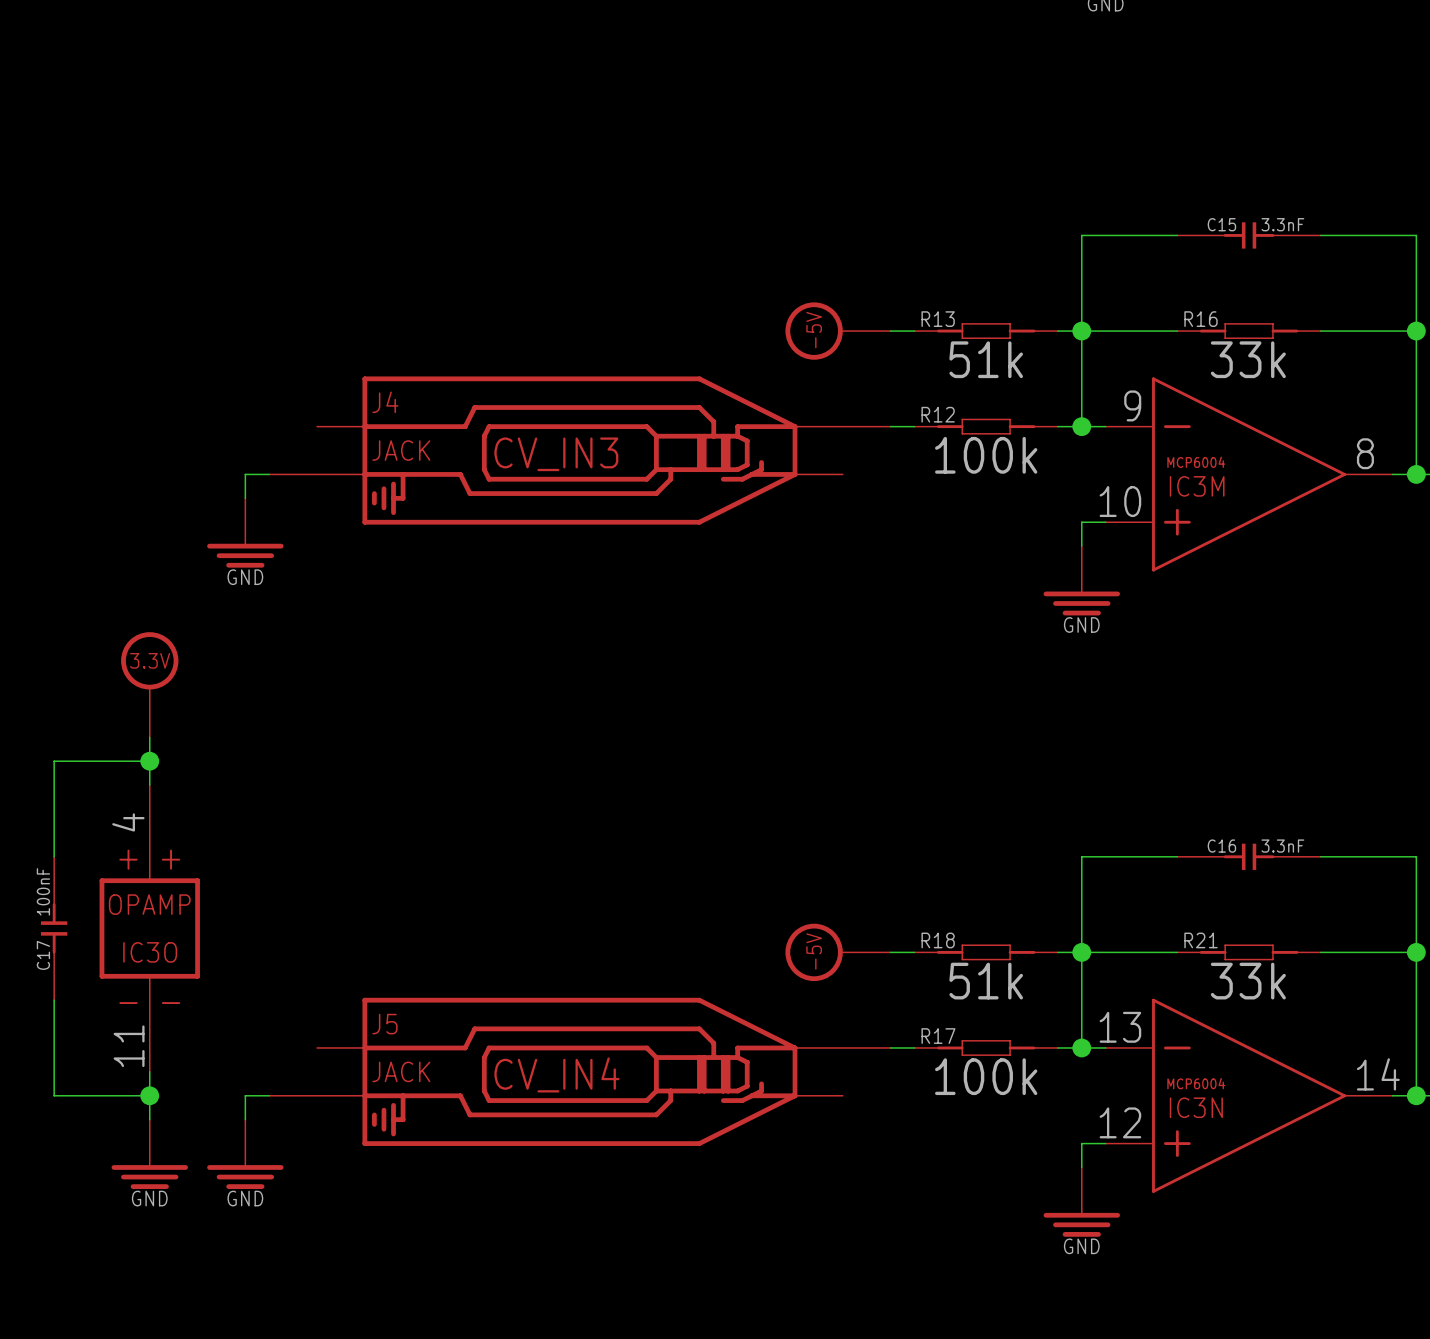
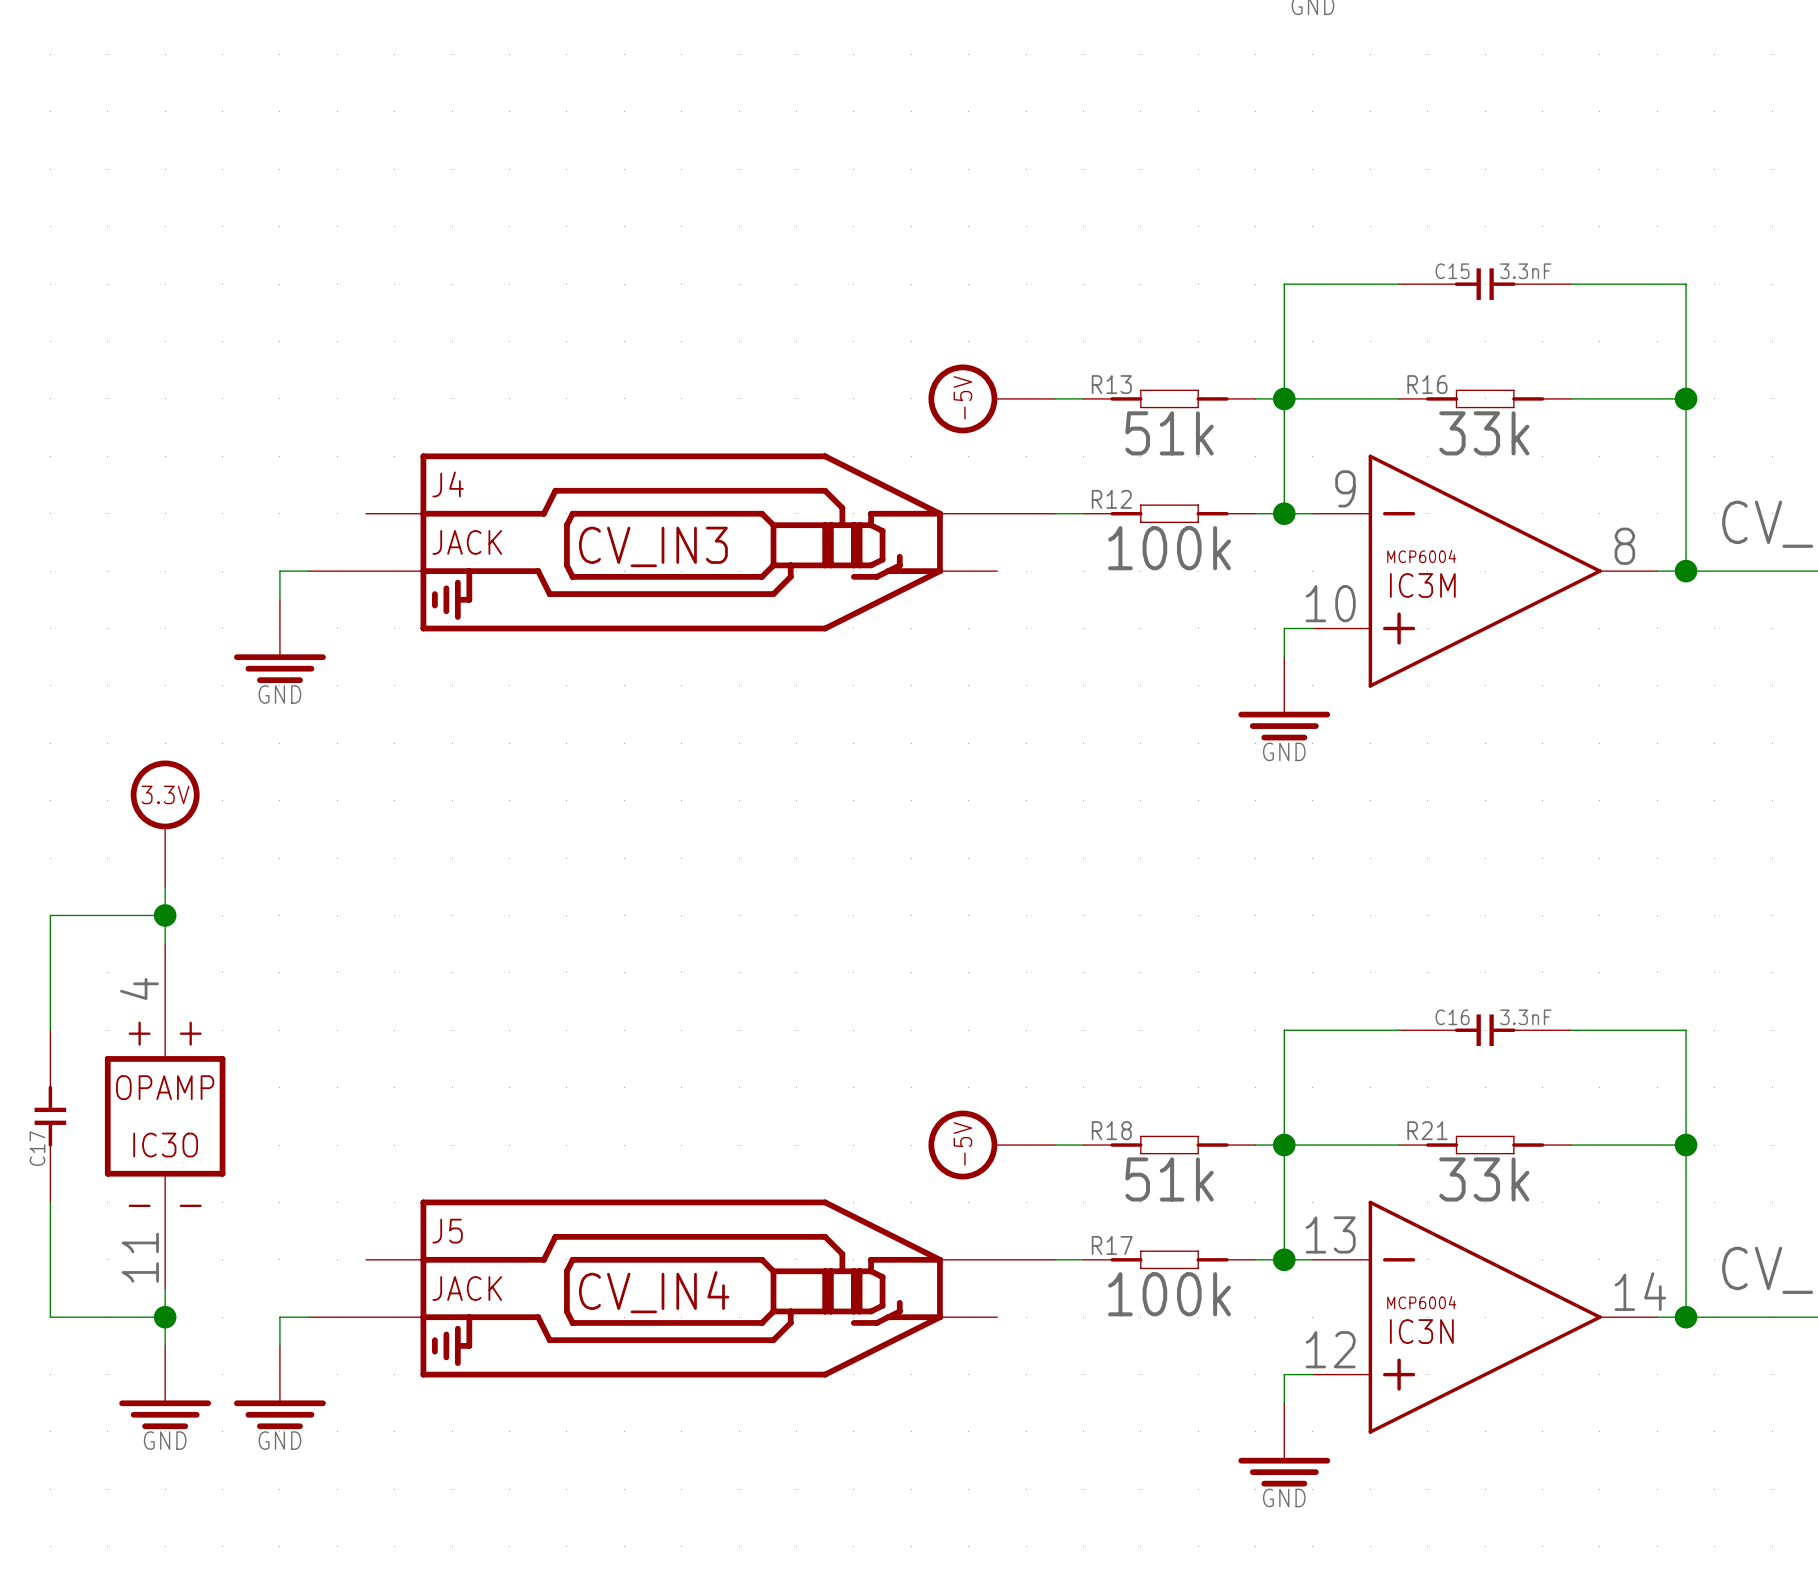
C17 value: 100nF (43, 891) -> none

